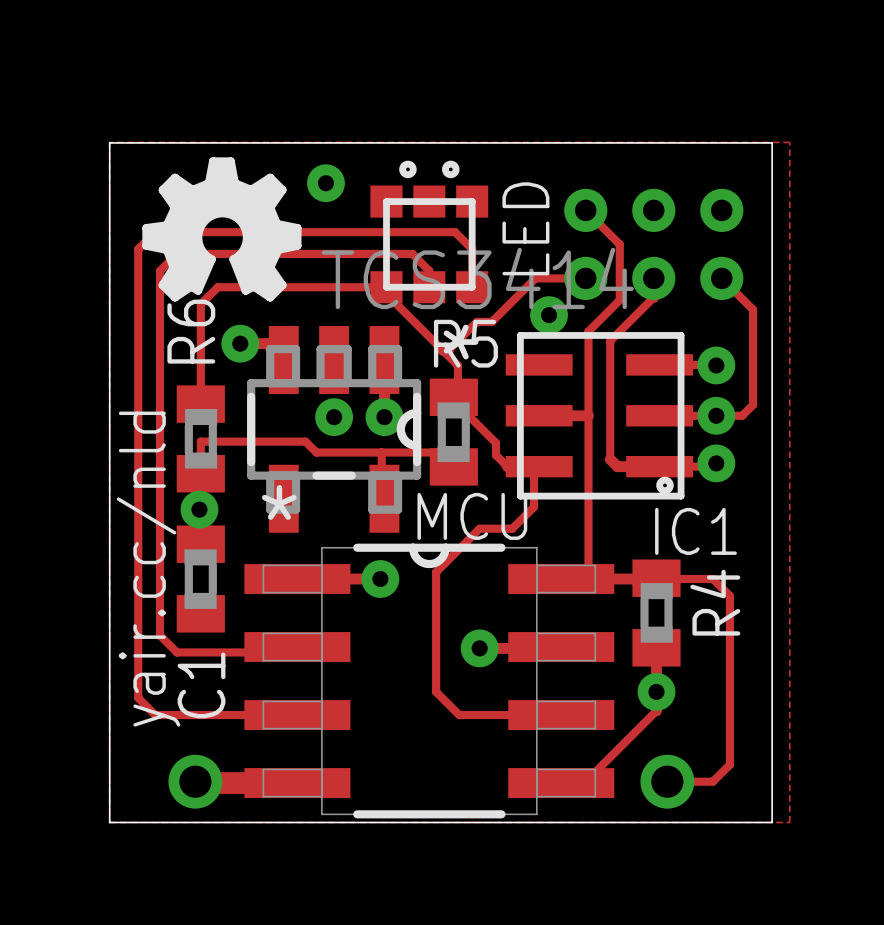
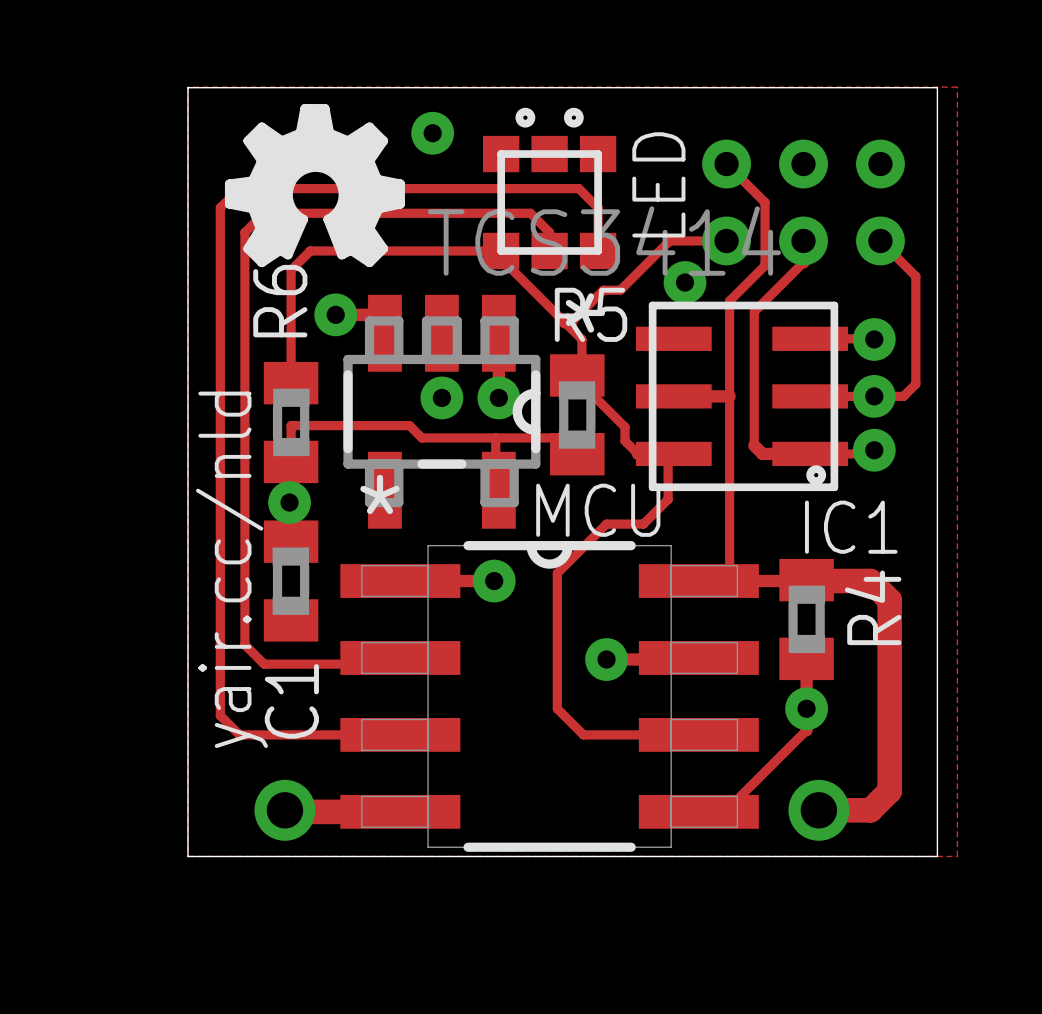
track width: thin (656, 579) (712, 579) (729, 596) (729, 764) (712, 781) (667, 781) -> thick (806, 581) (870, 581) (889, 600) (889, 791) (870, 810) (818, 810)

